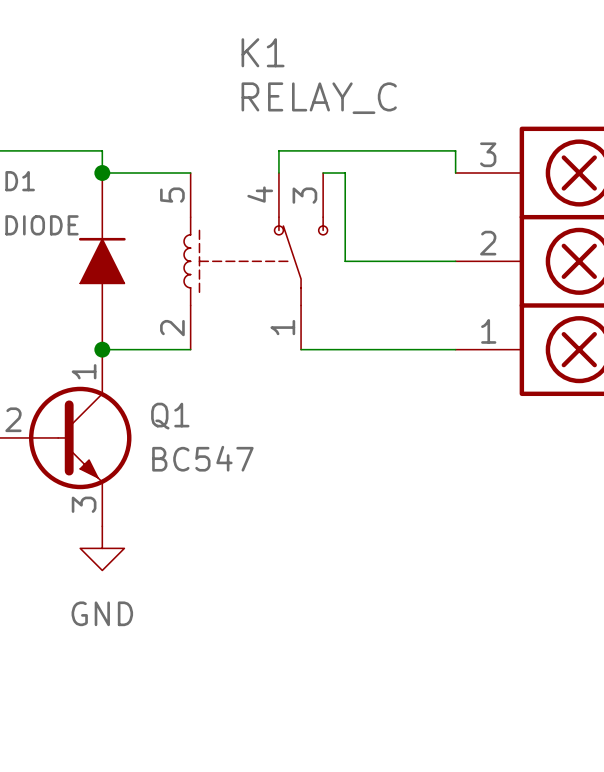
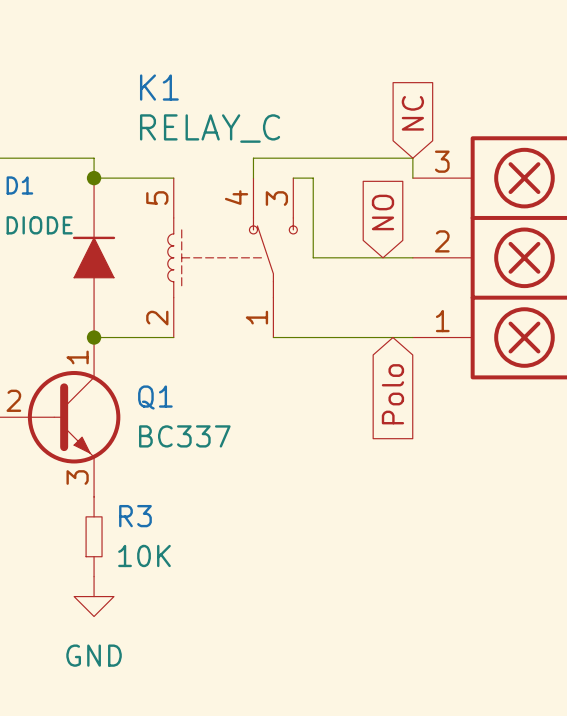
K1 name position: K1 (263, 52) -> K1 (159, 87)
K1 value position: RELAY_C (319, 98) -> RELAY_C (210, 128)
global label: none -> NC (412, 113)
global label: none -> NO (382, 212)
global label: none -> Polo (392, 394)
Q1 value: BC547 (202, 458) -> BC337 (184, 436)
power symbol position: GND (102, 548) -> GND (94, 596)
R3: none -> 10K (94, 536)

